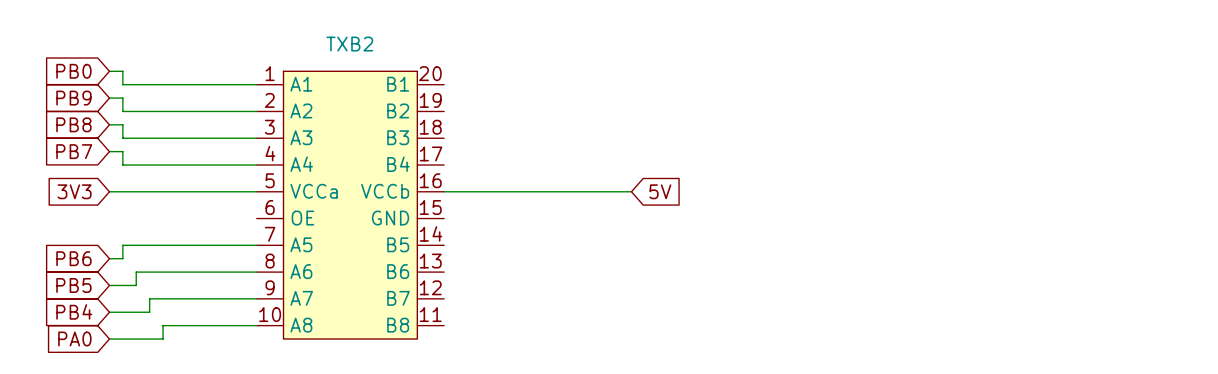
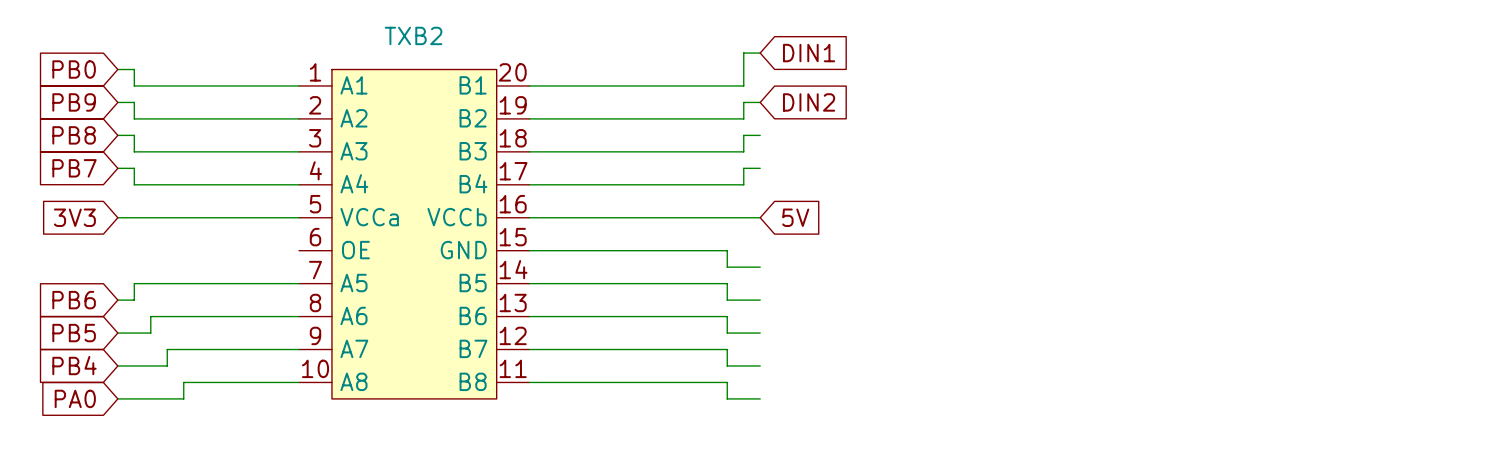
wire: none -> (760, 53) (743, 53) (743, 85) (529, 85)
global label: none -> DIN1 (809, 53)
wire: none -> (760, 102) (743, 102) (743, 118) (529, 118)
global label: none -> DIN2 (809, 102)
wire: none -> (760, 135) (743, 135) (743, 151) (529, 151)
wire: none -> (760, 168) (743, 168) (743, 184) (529, 184)
wire: none -> (529, 250) (727, 250) (727, 267) (760, 267)
wire: none -> (529, 283) (727, 283) (727, 300) (760, 300)
wire: none -> (529, 316) (727, 316) (727, 333) (760, 333)
wire: none -> (529, 349) (727, 349) (727, 365) (760, 365)
wire: none -> (529, 382) (727, 382) (727, 398) (760, 398)

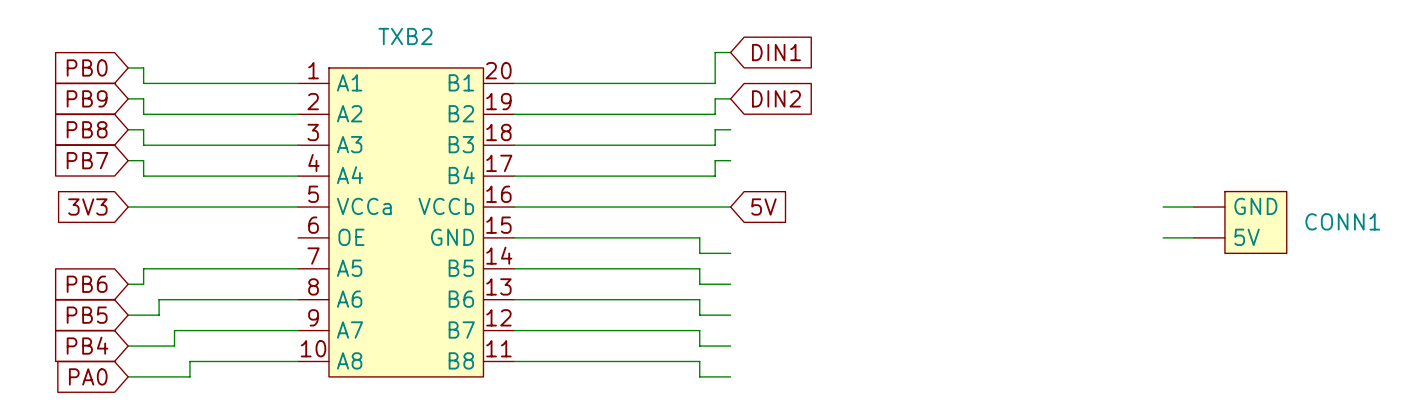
wire: none -> (1163, 207) (1194, 207)
CONN1: none -> (1240, 222)
wire: none -> (1163, 237) (1194, 237)

